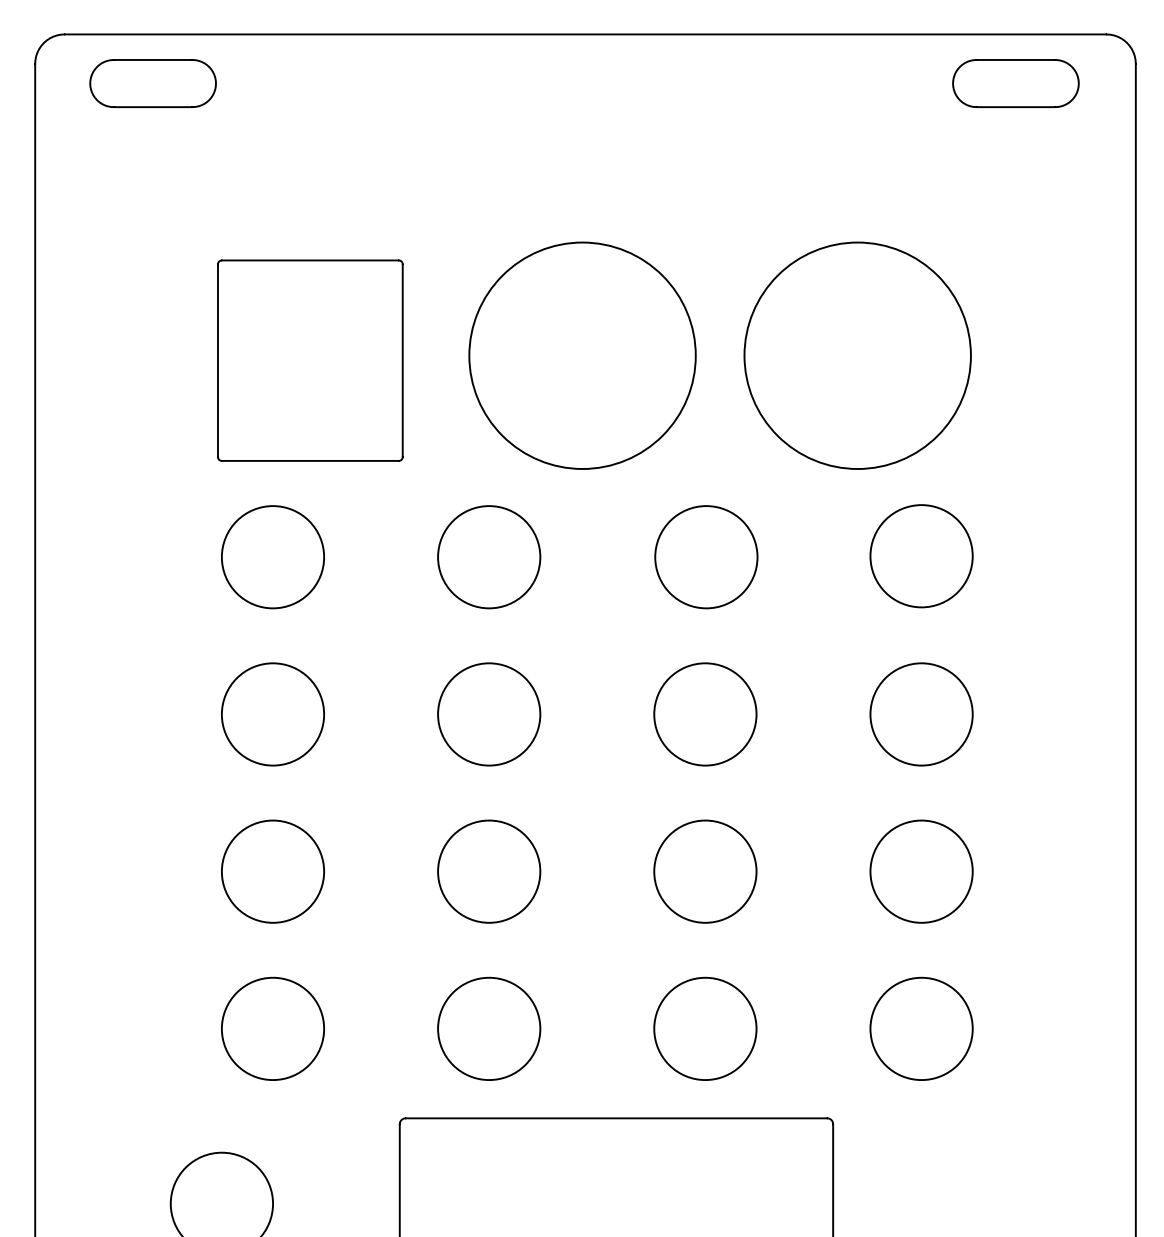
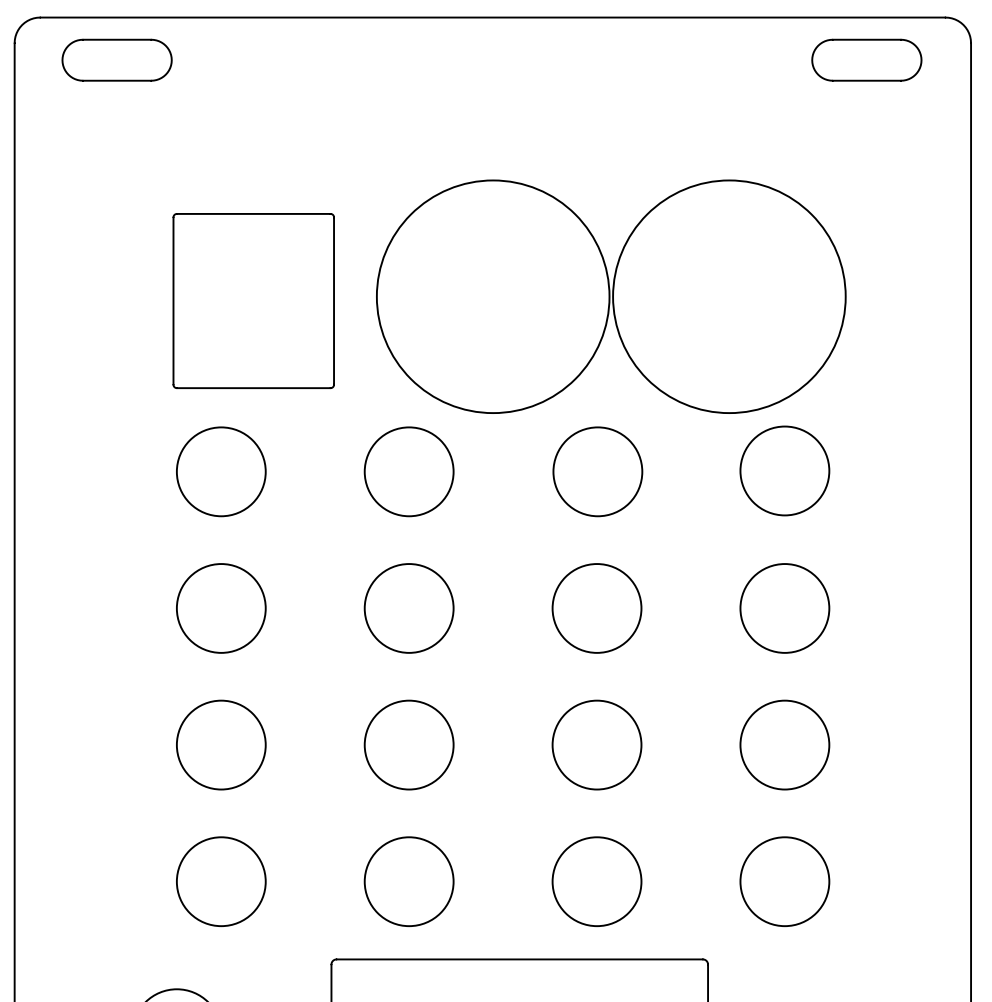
round board edge size: [468, 242, 697, 470] -> [376, 180, 610, 414]
round board edge size: [744, 242, 972, 470] -> [612, 180, 847, 414]

